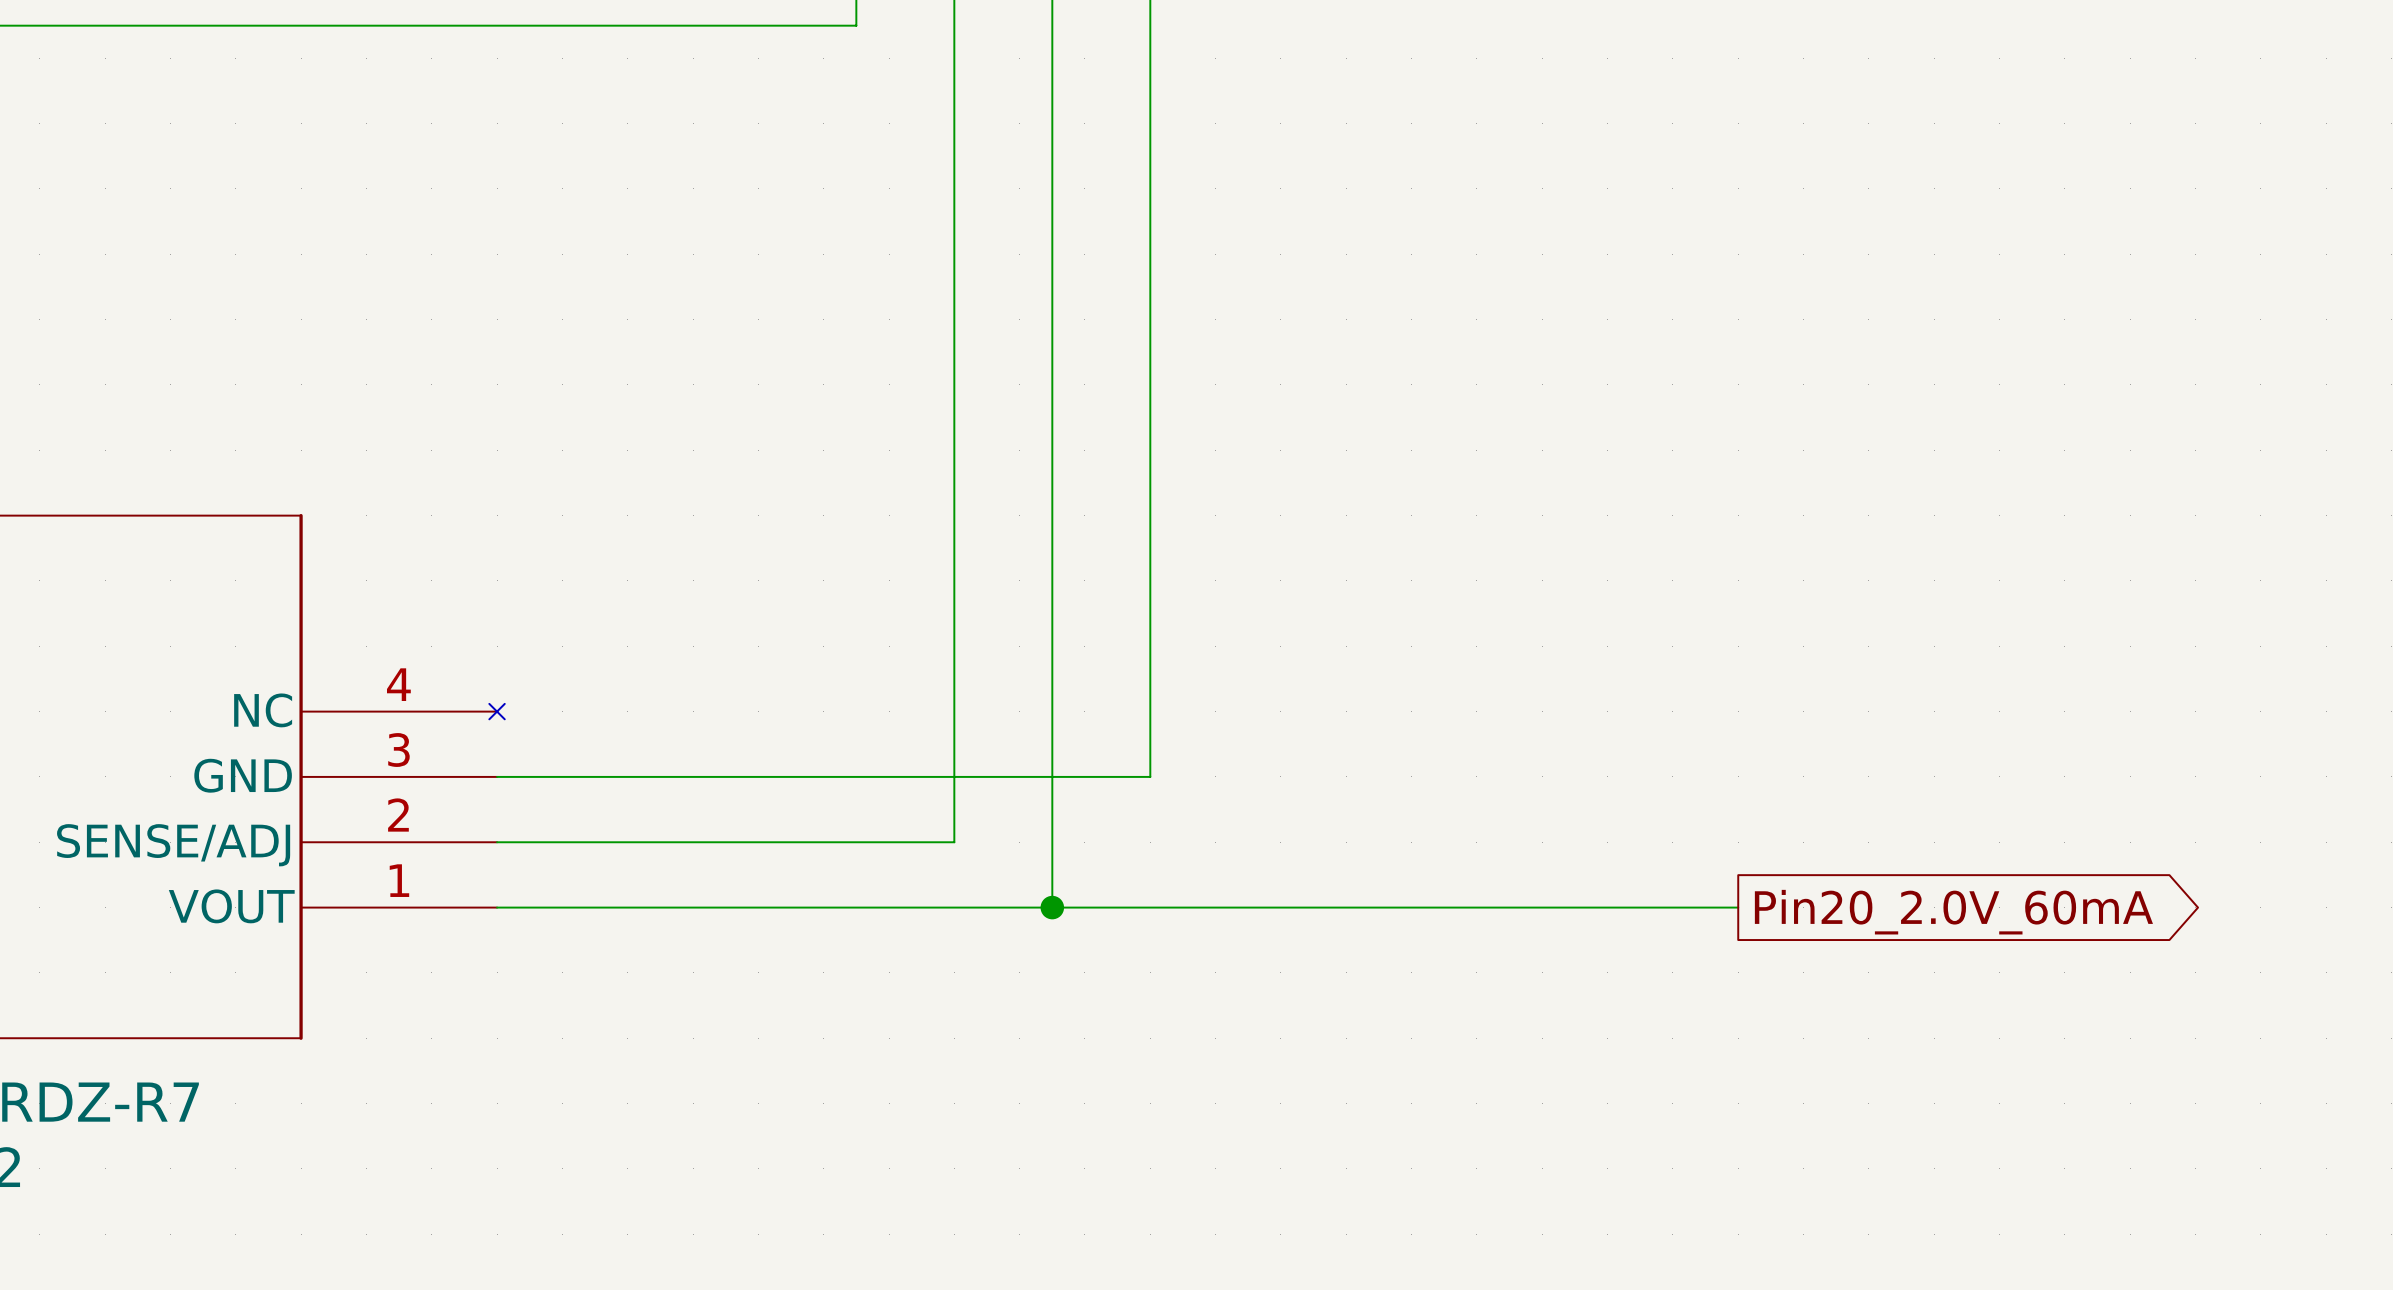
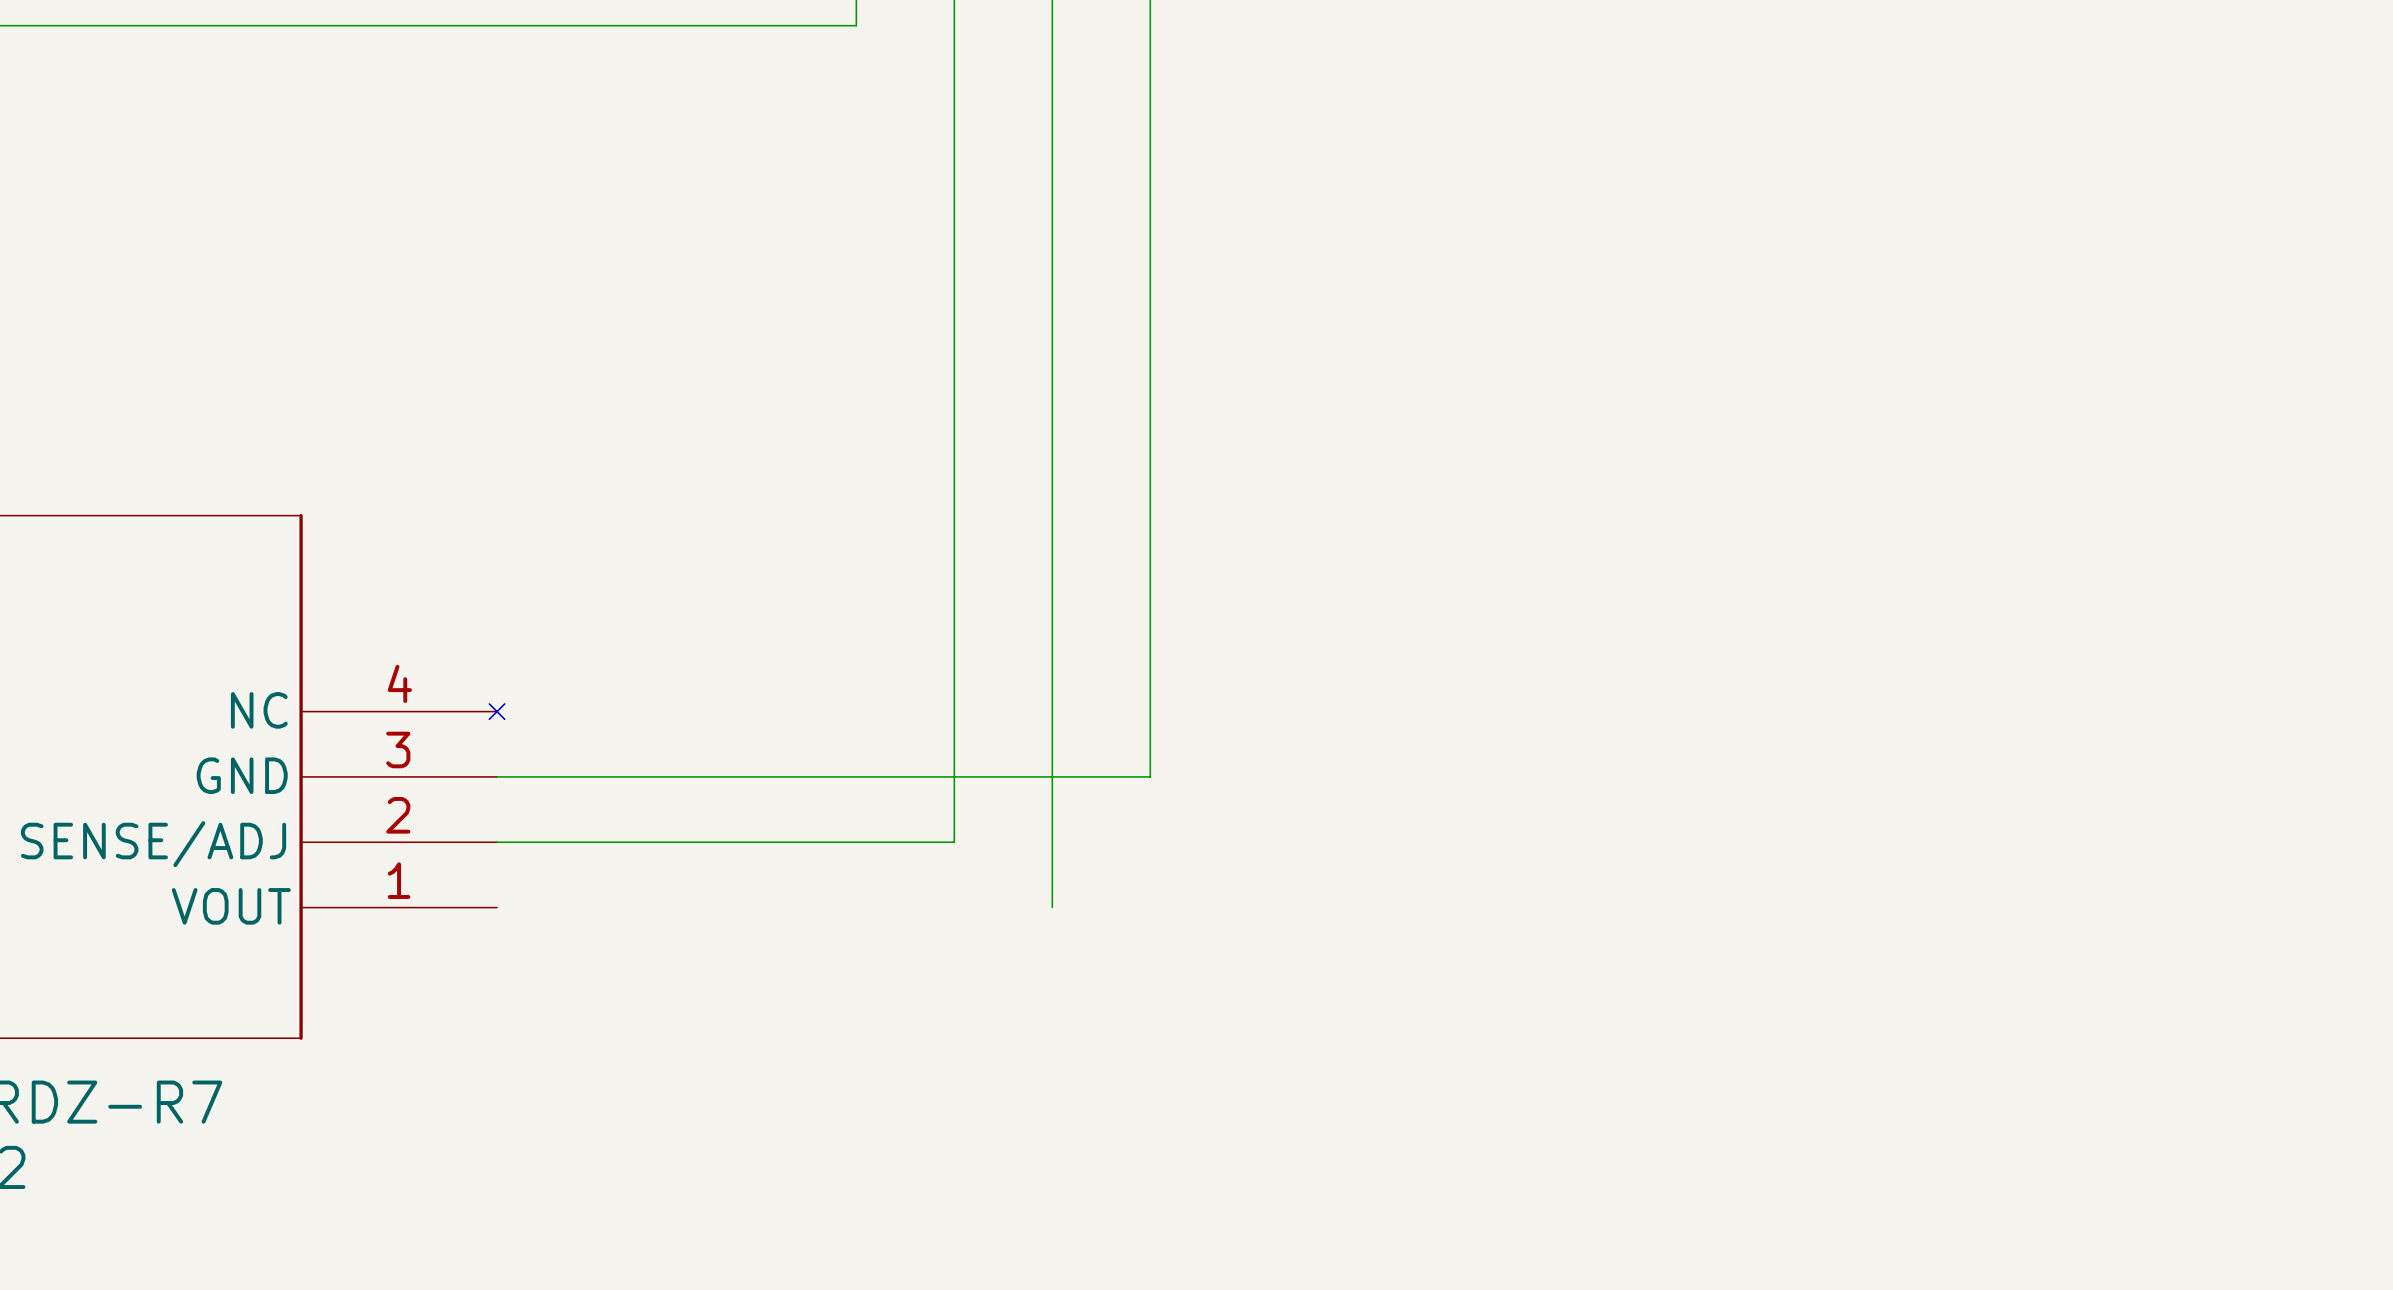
wire: (497, 907) (1738, 907) -> none
junction: (1052, 907) -> none
global label: Pin20_2.0V_60mA (1953, 912) -> none

